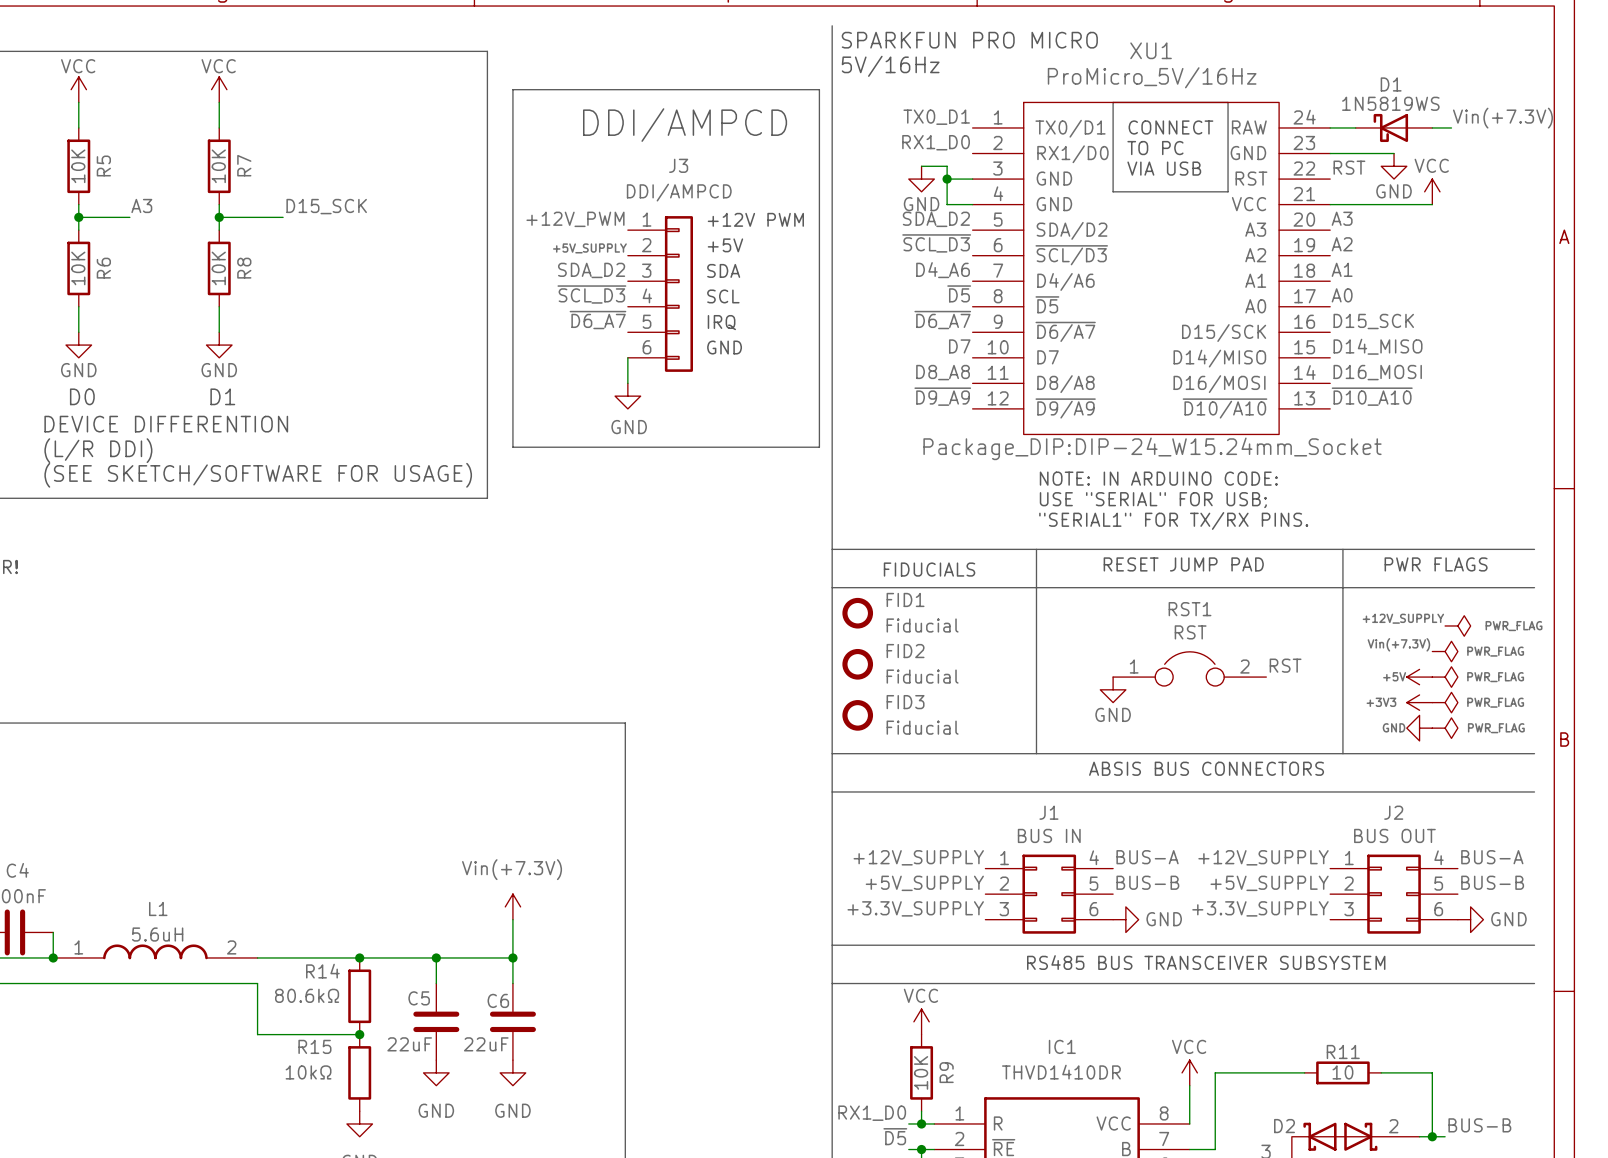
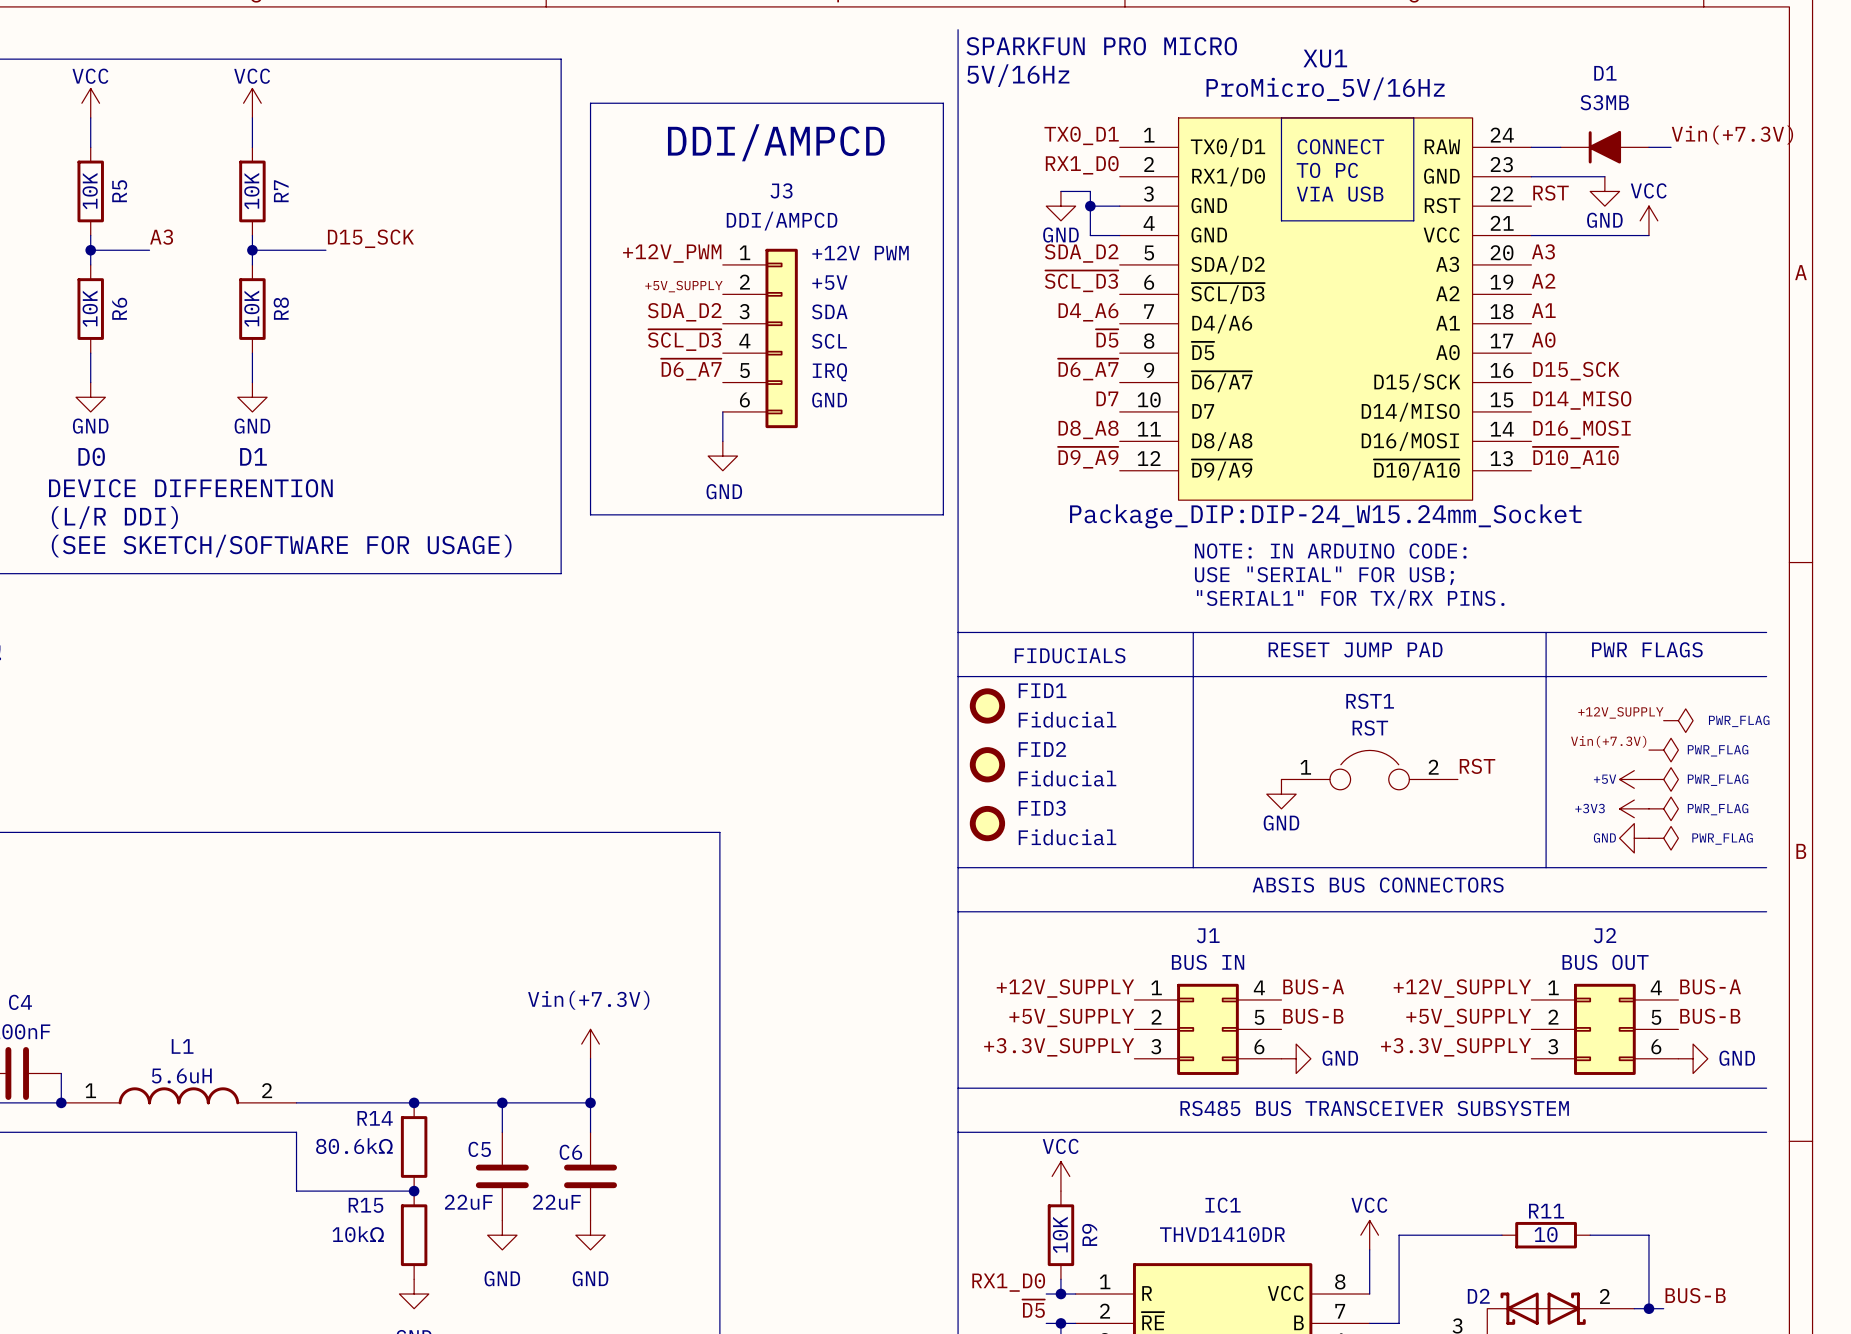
D1 name position: D1 (1391, 84) -> D1 (1605, 73)
D1 value: 1N5819WS (1390, 103) -> S3MB (1604, 102)
D1 symbol: [1355, 113, 1433, 143] -> [1560, 131, 1649, 164]

